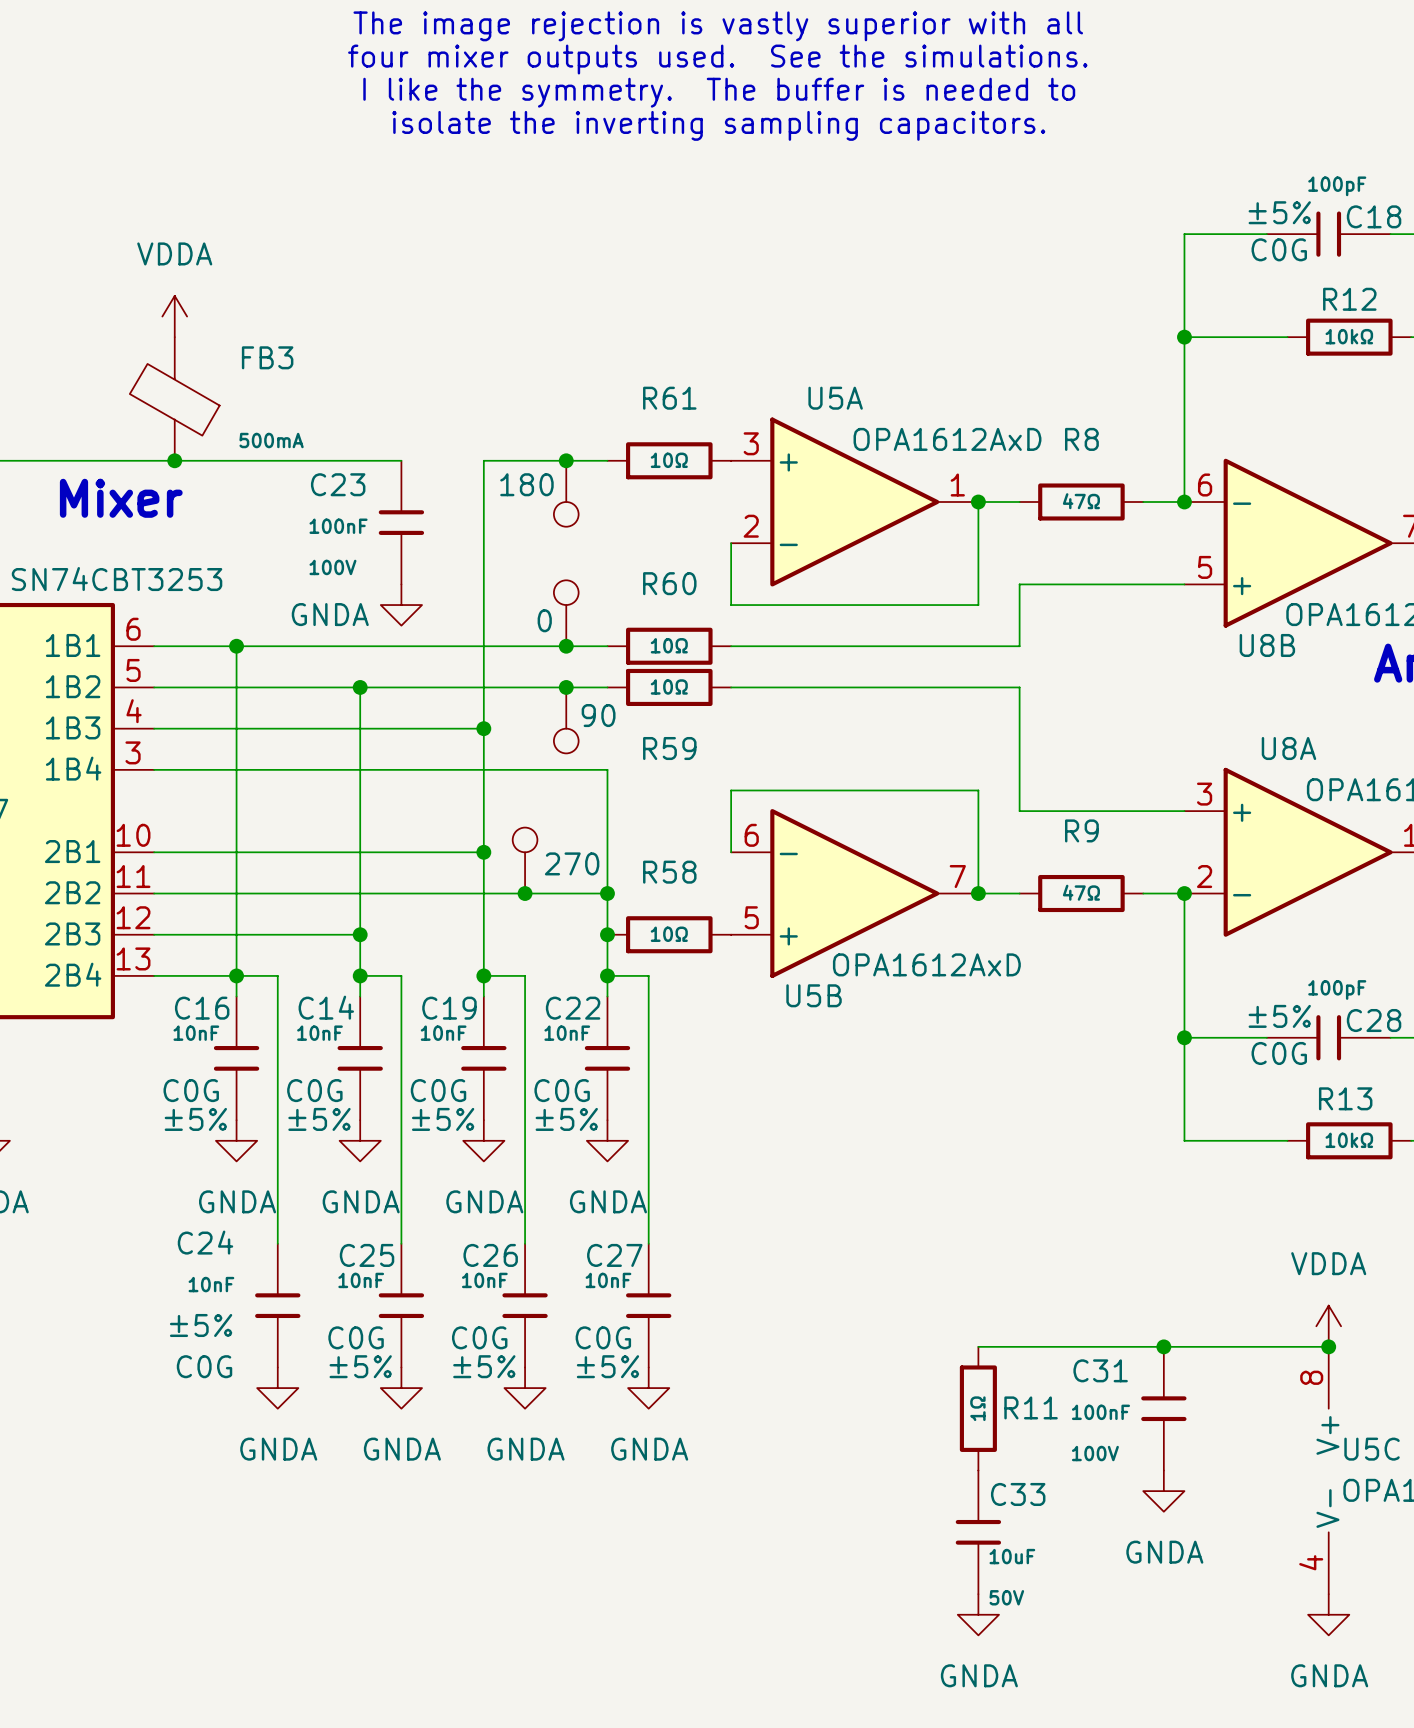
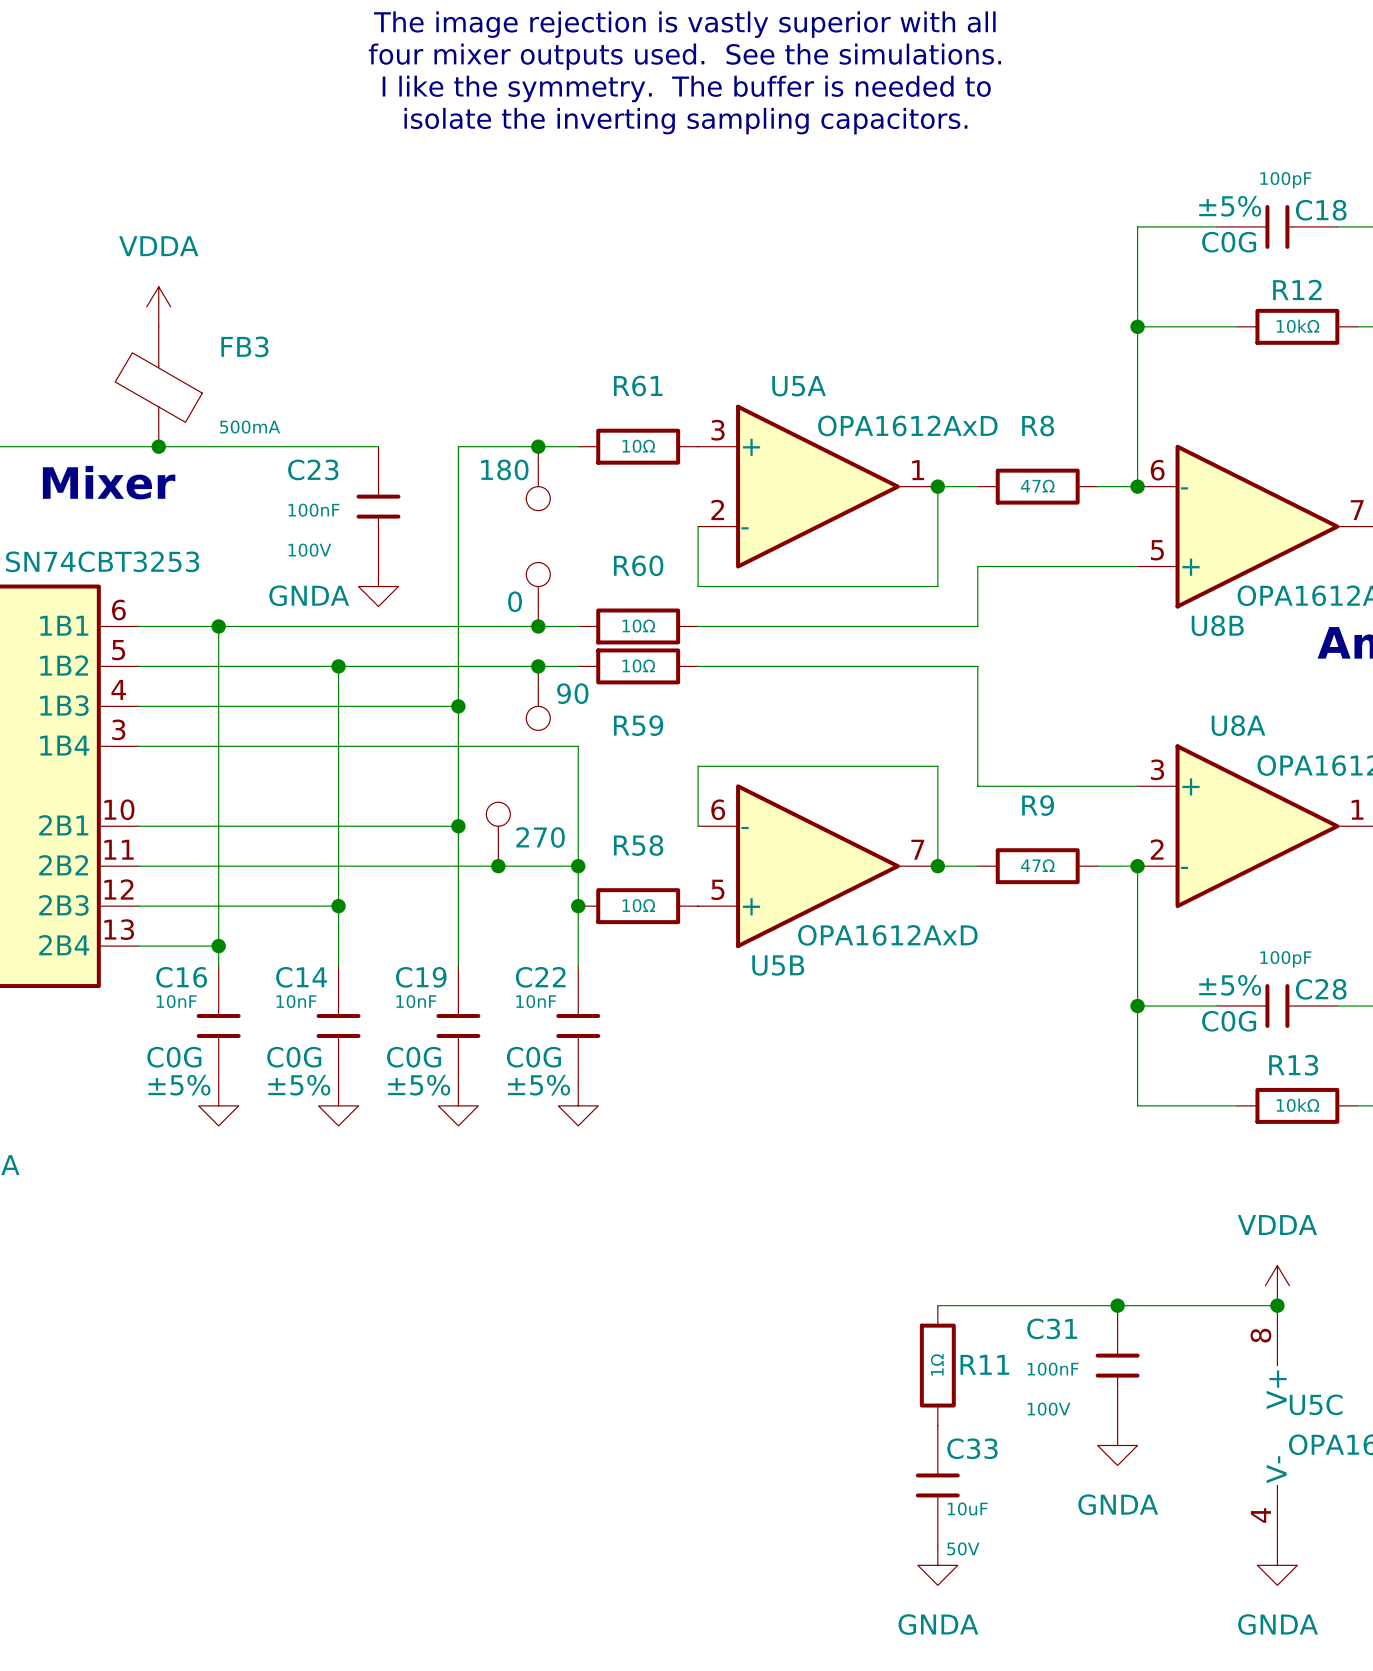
wire: (236, 975) (277, 975) (277, 1243) -> none
wire: (360, 975) (401, 975) (401, 1243) -> none
junction: (360, 975) -> none
wire: (483, 975) (525, 975) (525, 1243) -> none
junction: (483, 975) -> none
wire: (607, 975) (648, 975) (648, 1243) -> none
junction: (607, 975) -> none
power symbol text: GNDA (237, 1201) -> none
power symbol text: GNDA (361, 1201) -> none
power symbol text: GNDA (484, 1201) -> none
power symbol text: GNDA (608, 1201) -> none
C24: 10nF (277, 1305) -> none
C25: 10nF (401, 1305) -> none
C26: 10nF (525, 1305) -> none
C27: 10nF (648, 1305) -> none
power symbol: GNDA (277, 1388) -> none
power symbol: GNDA (401, 1388) -> none
power symbol: GNDA (525, 1388) -> none
power symbol: GNDA (648, 1388) -> none

